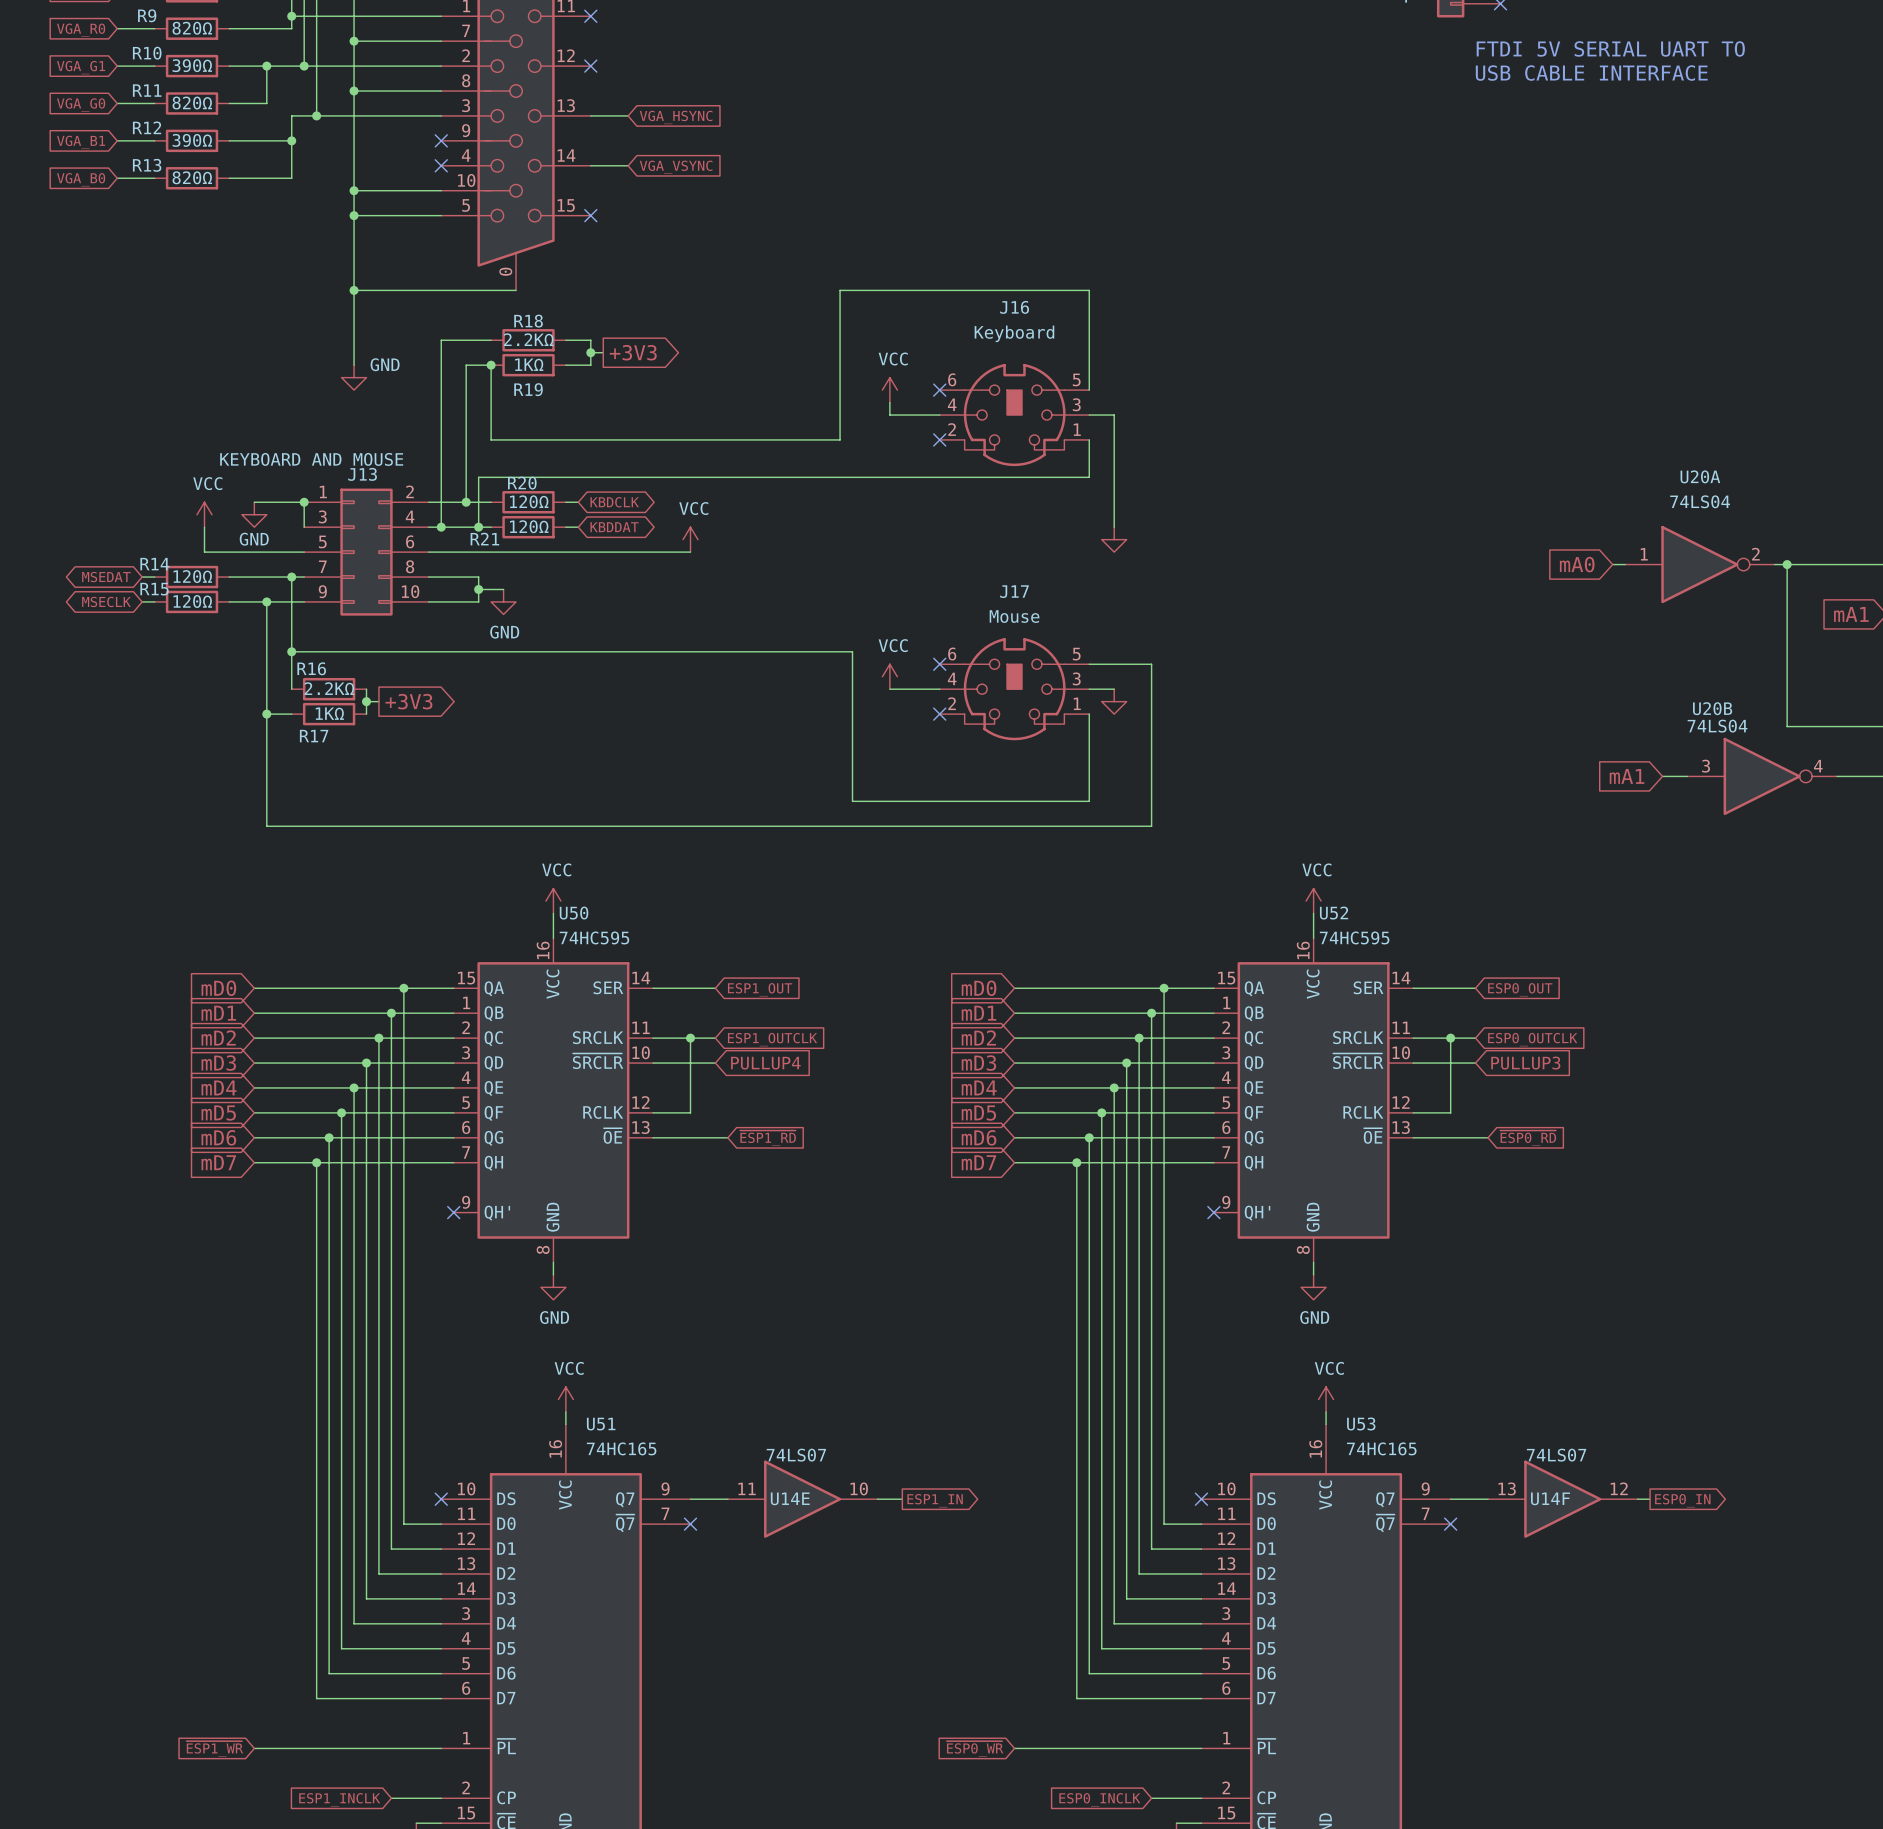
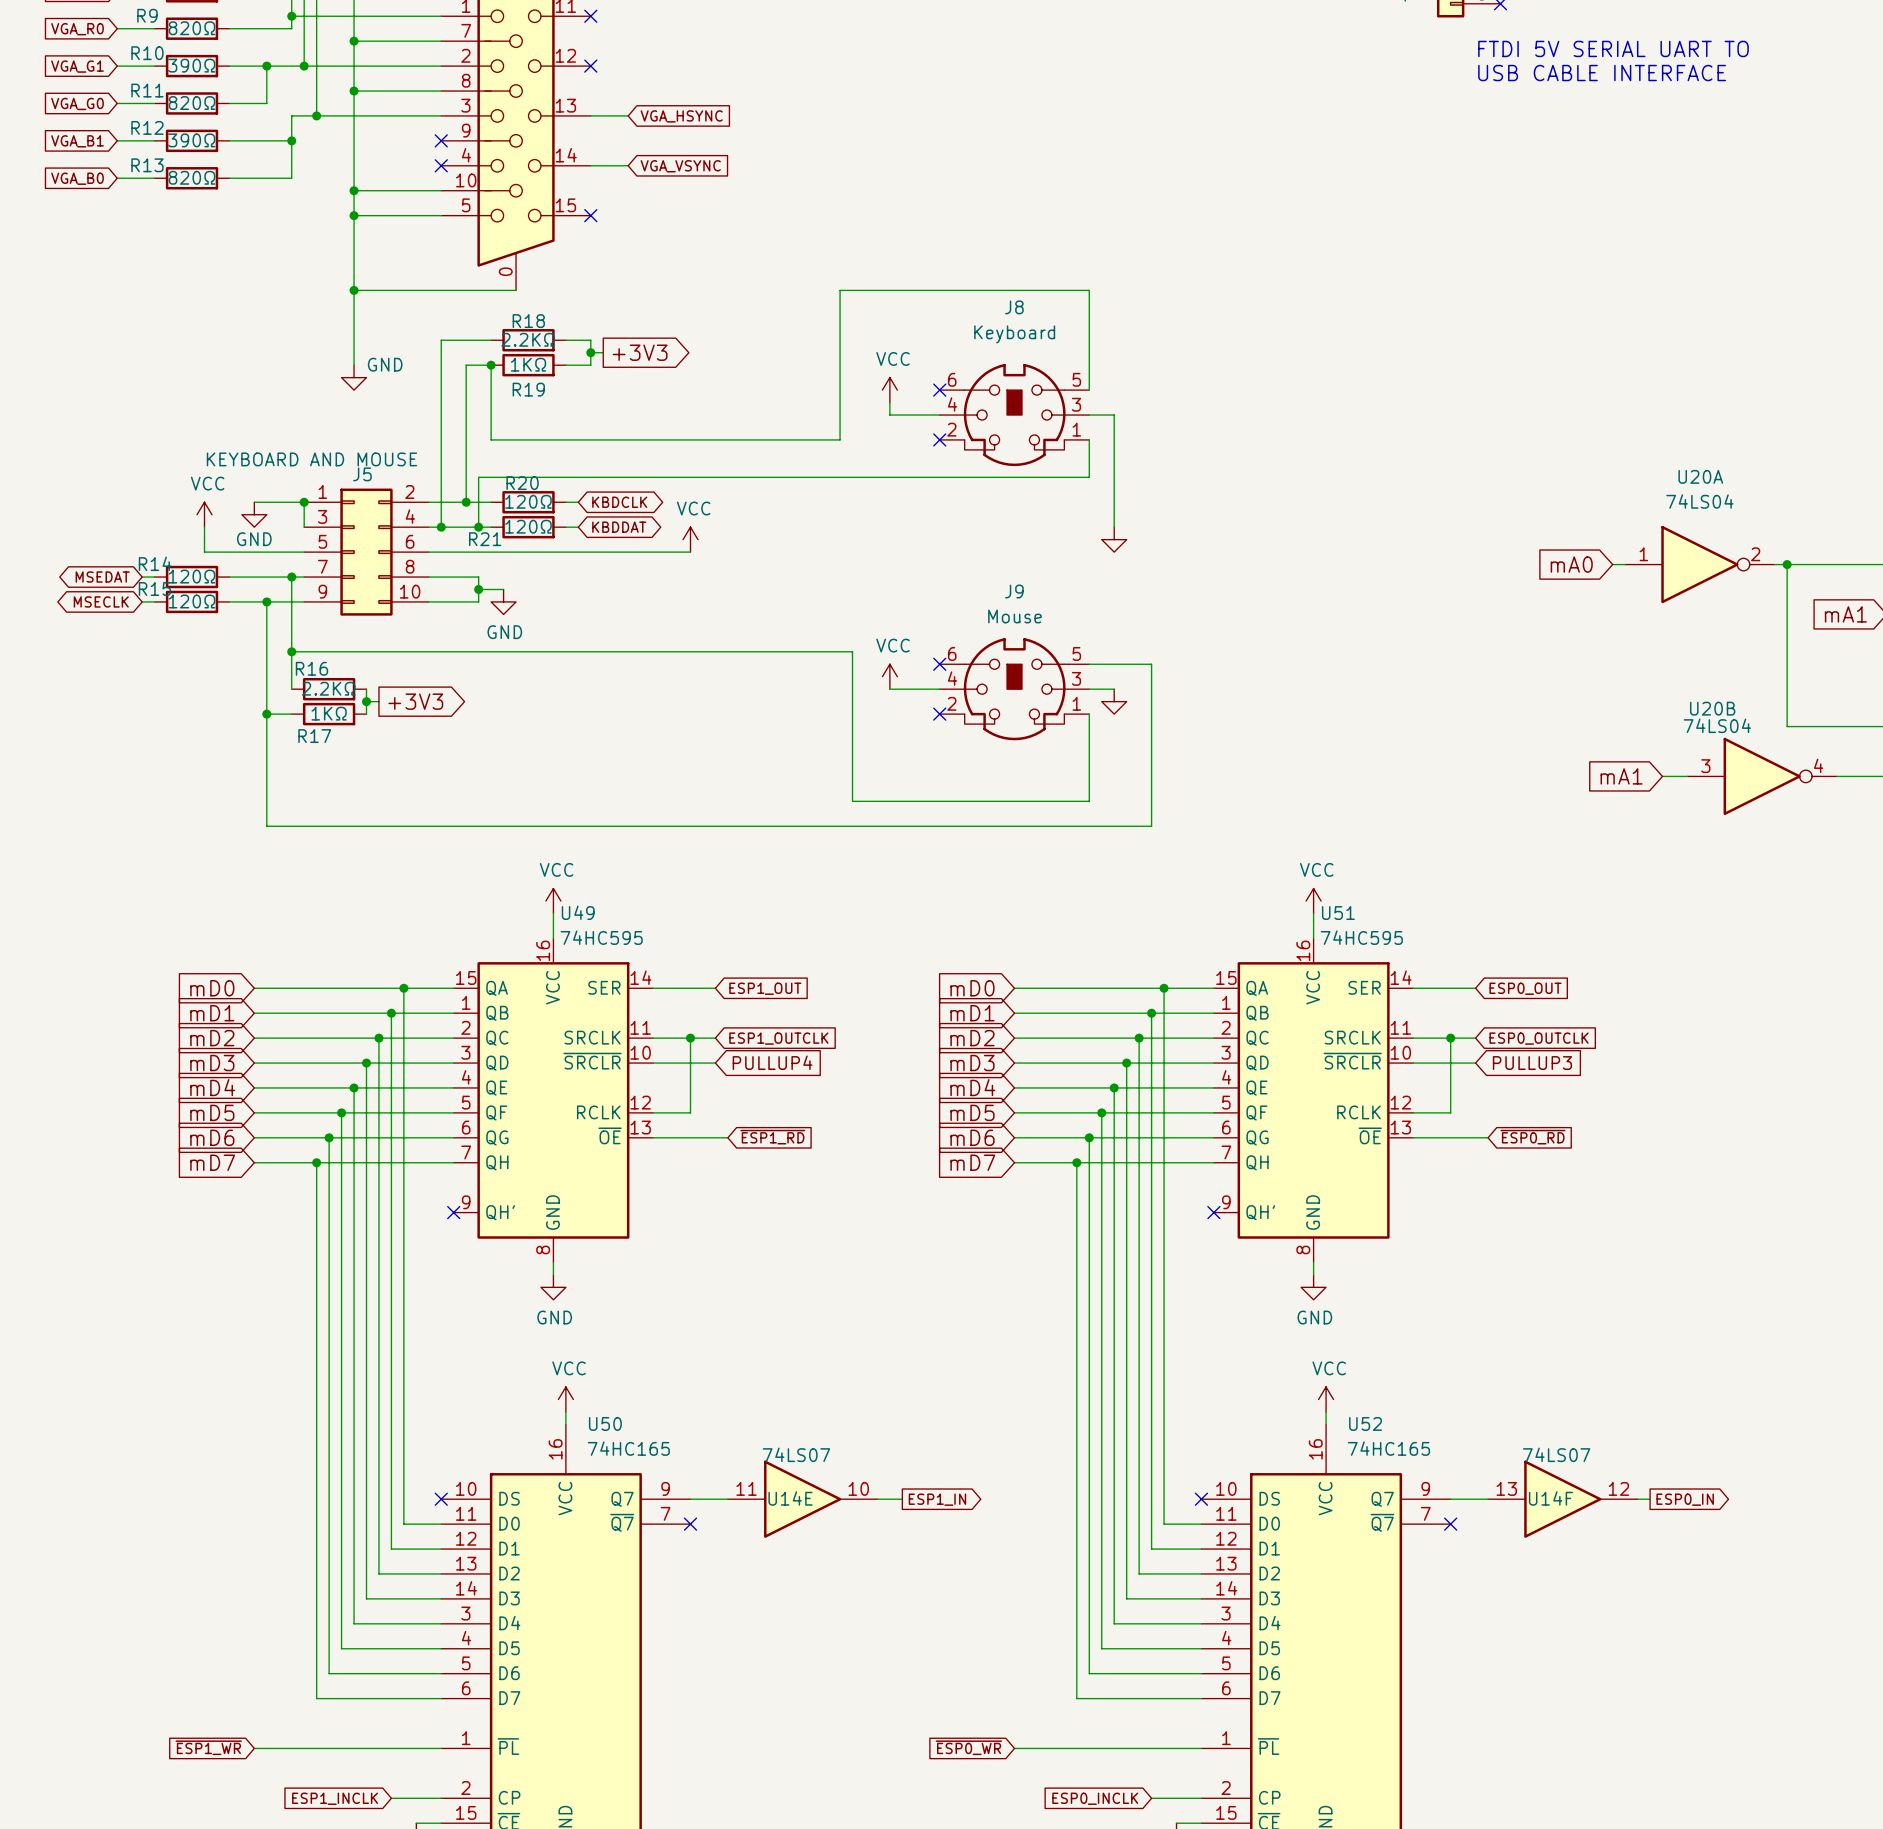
J16 name: J16 (1014, 307) -> J8 (1014, 307)
J13 name: J13 (362, 474) -> J5 (362, 474)
J17 name: J17 (1014, 591) -> J9 (1014, 591)
U50 name: U50 (574, 913) -> U49 (578, 912)
U52 name: U52 (1334, 913) -> U51 (1338, 913)
U53 name: U53 (1361, 1423) -> U52 (1365, 1423)
U51 name: U51 (601, 1424) -> U50 (605, 1423)

